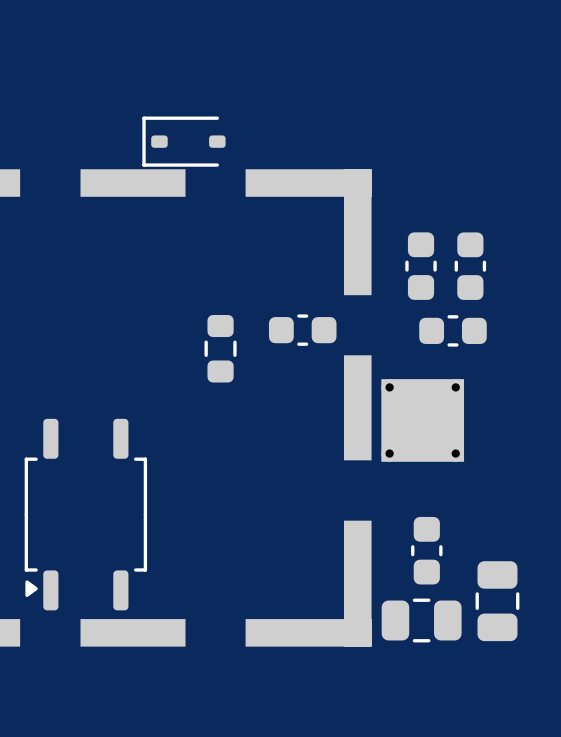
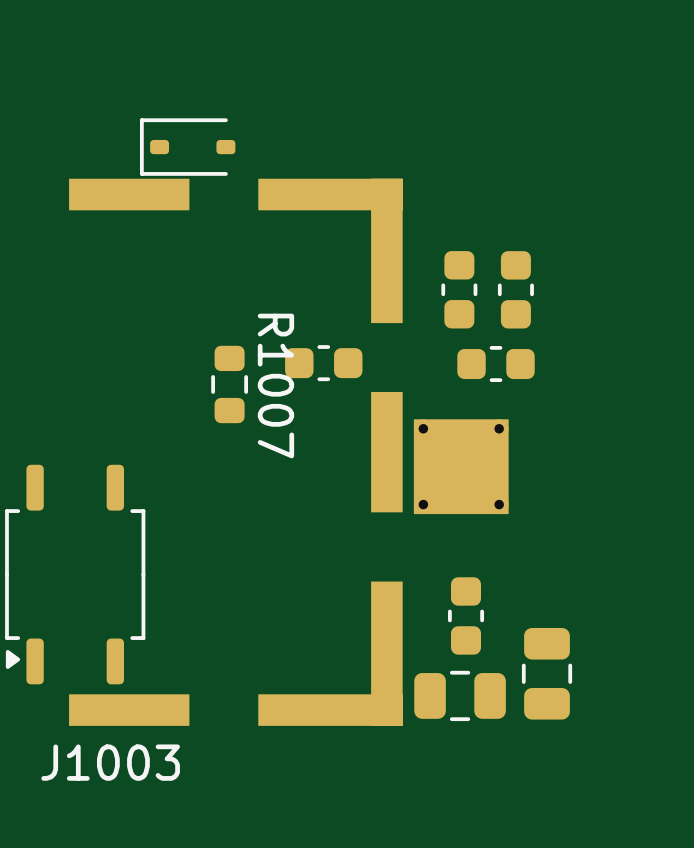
R1007 name: none -> R1007 (275, 385)
J1003 name: none -> J1003 (110, 762)

